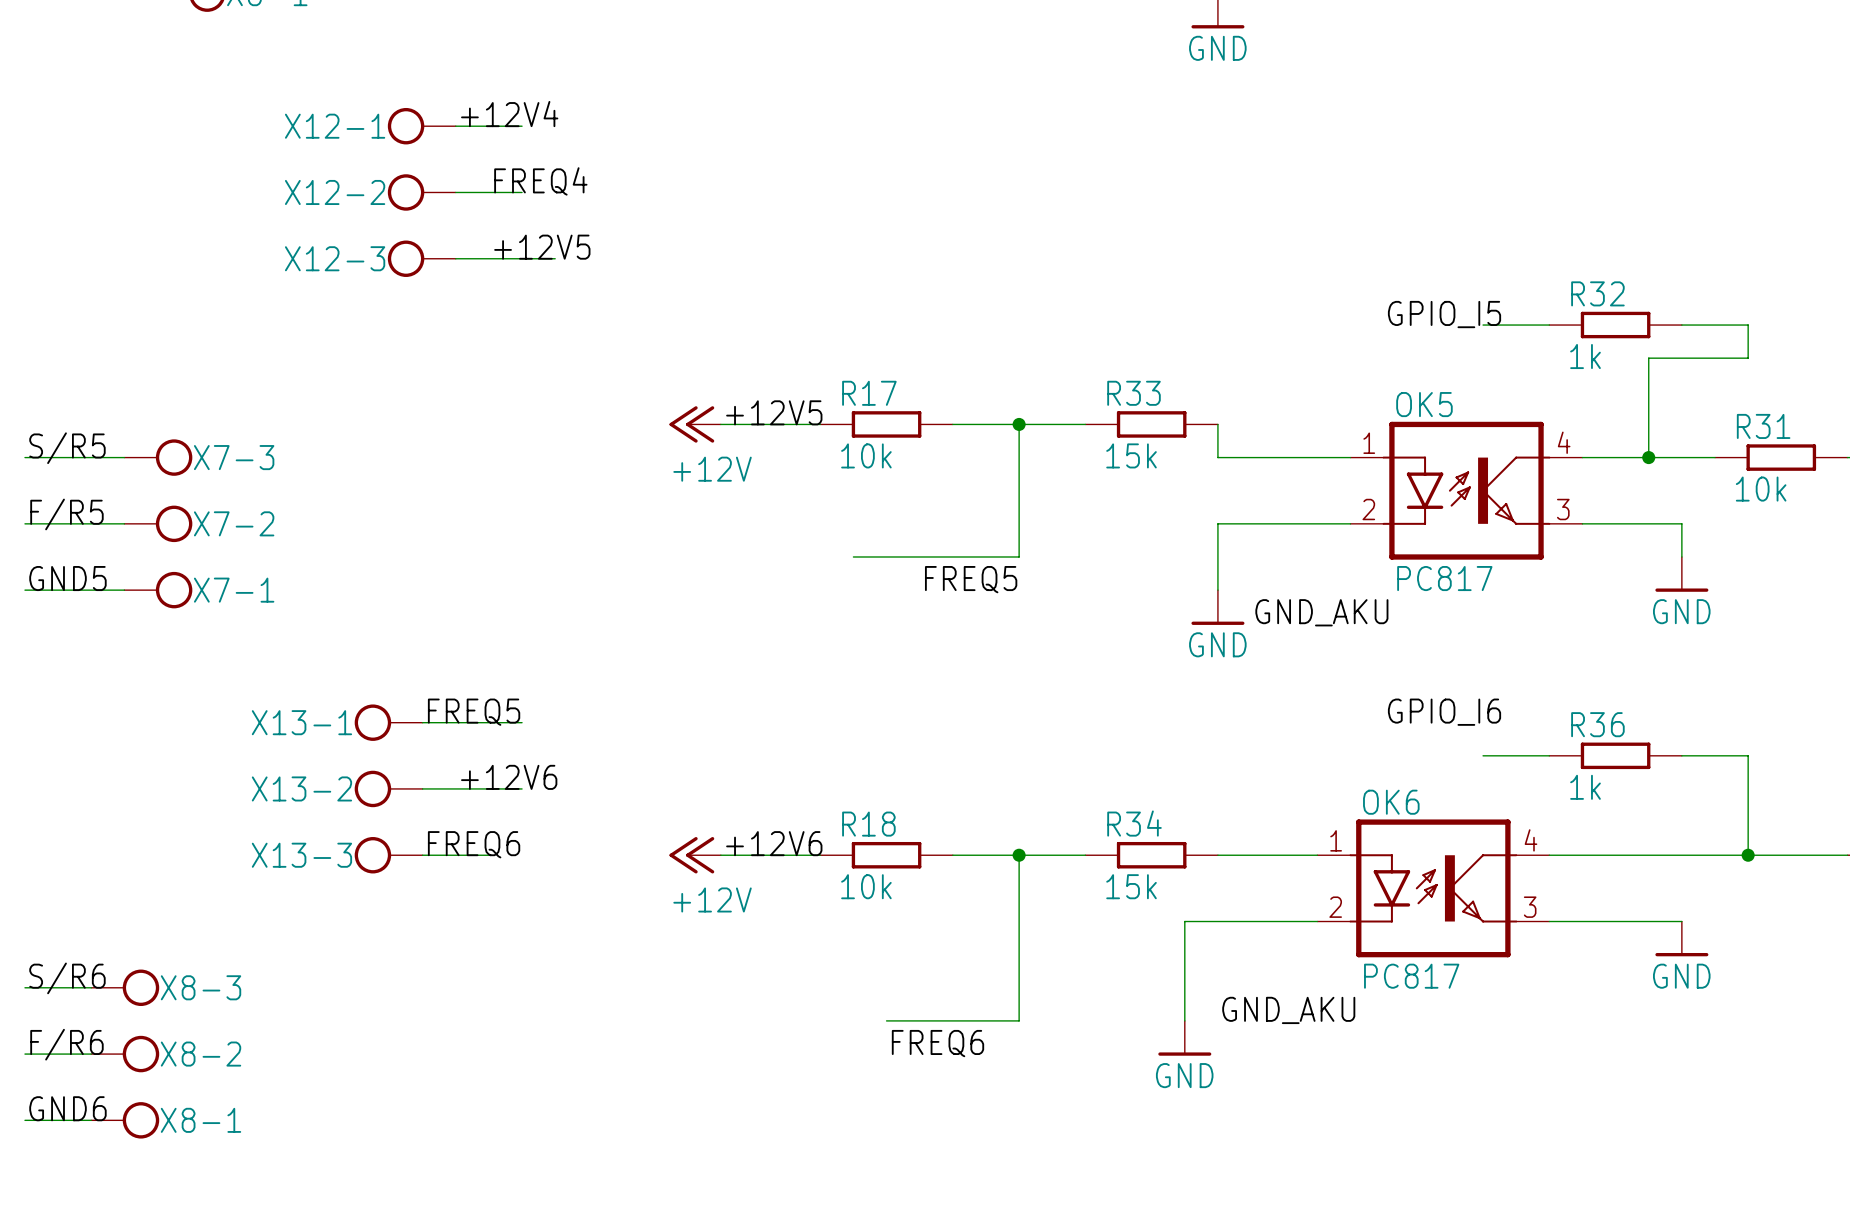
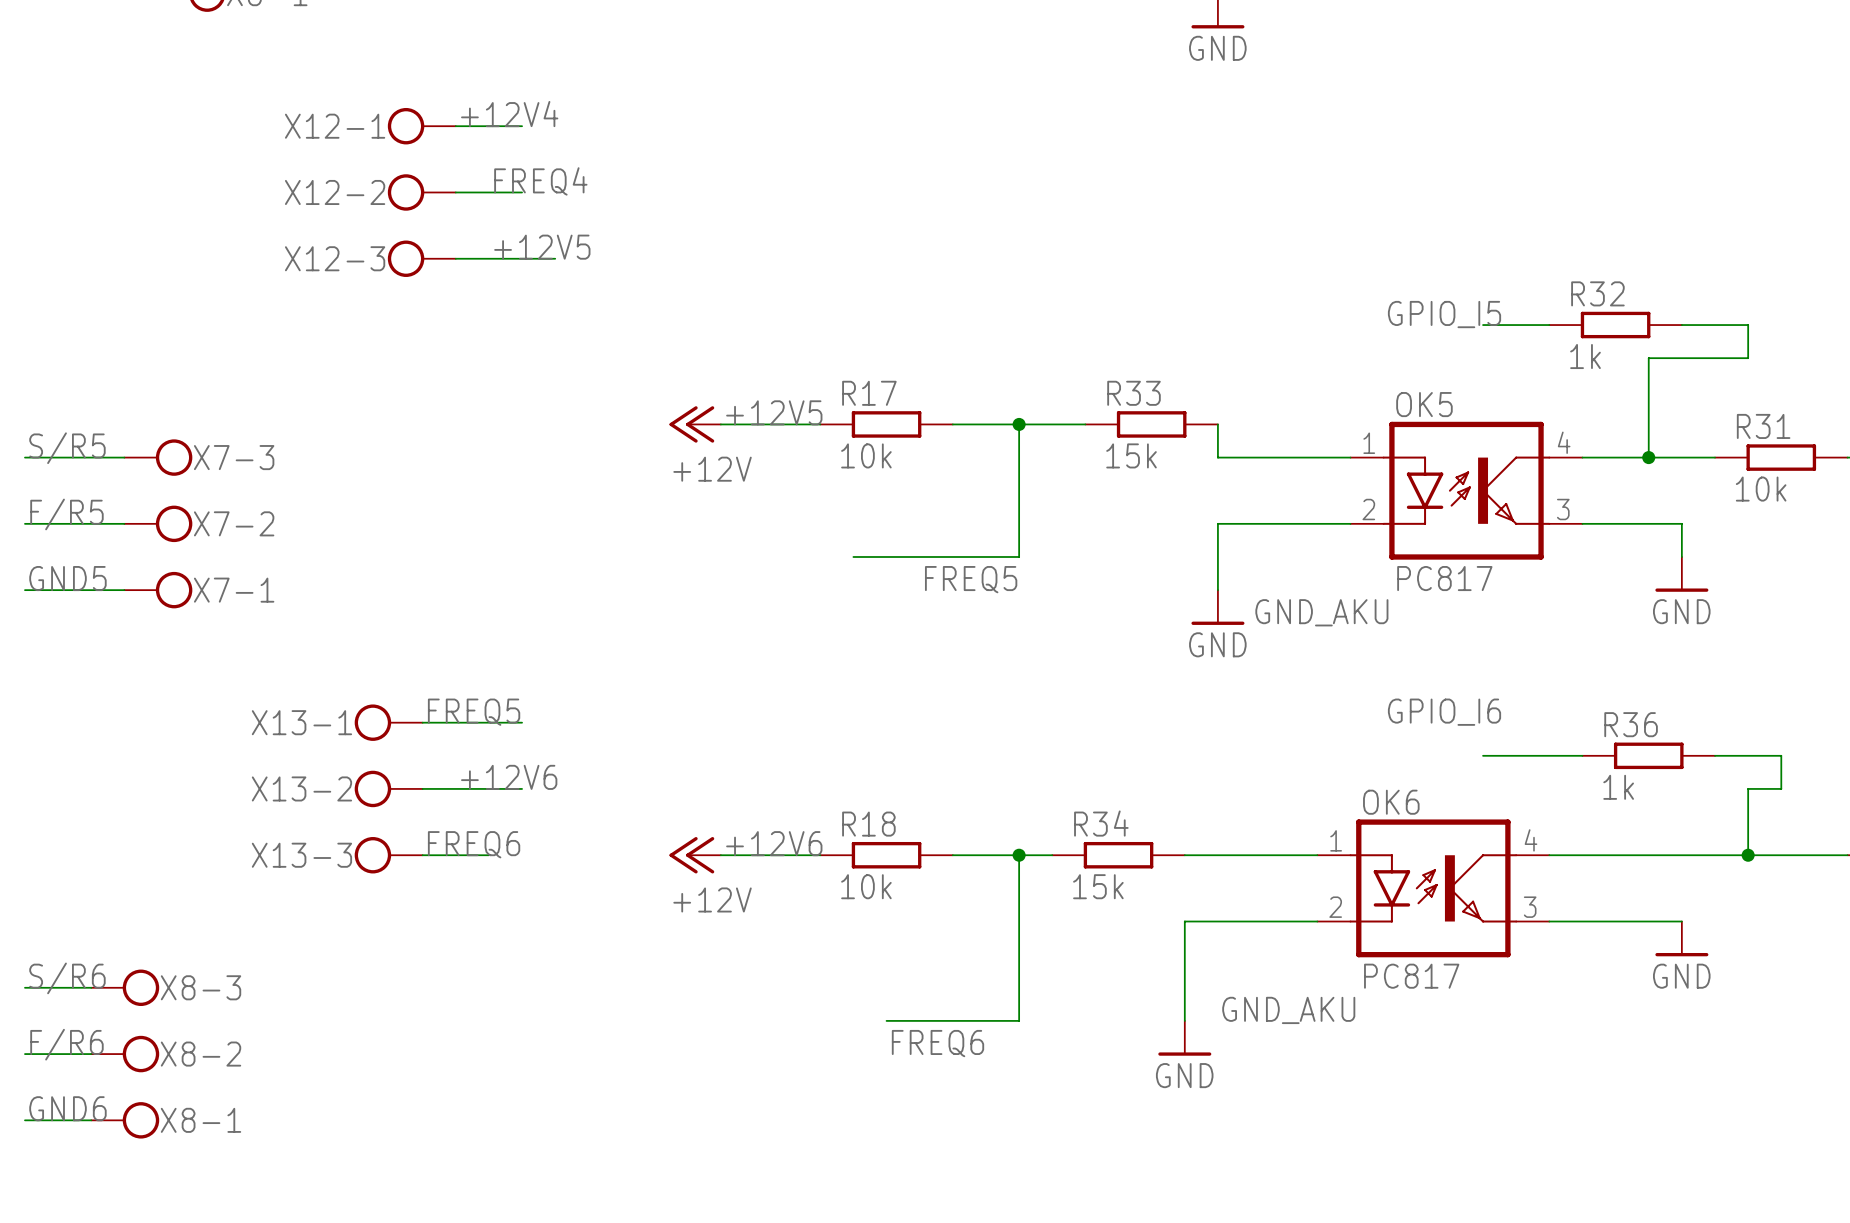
R36 position: (1615, 755) -> (1648, 755)
wire: (1748, 755) (1748, 788) -> (1748, 755) (1781, 755) (1781, 788) (1748, 788)
R34 position: (1151, 855) -> (1118, 855)

